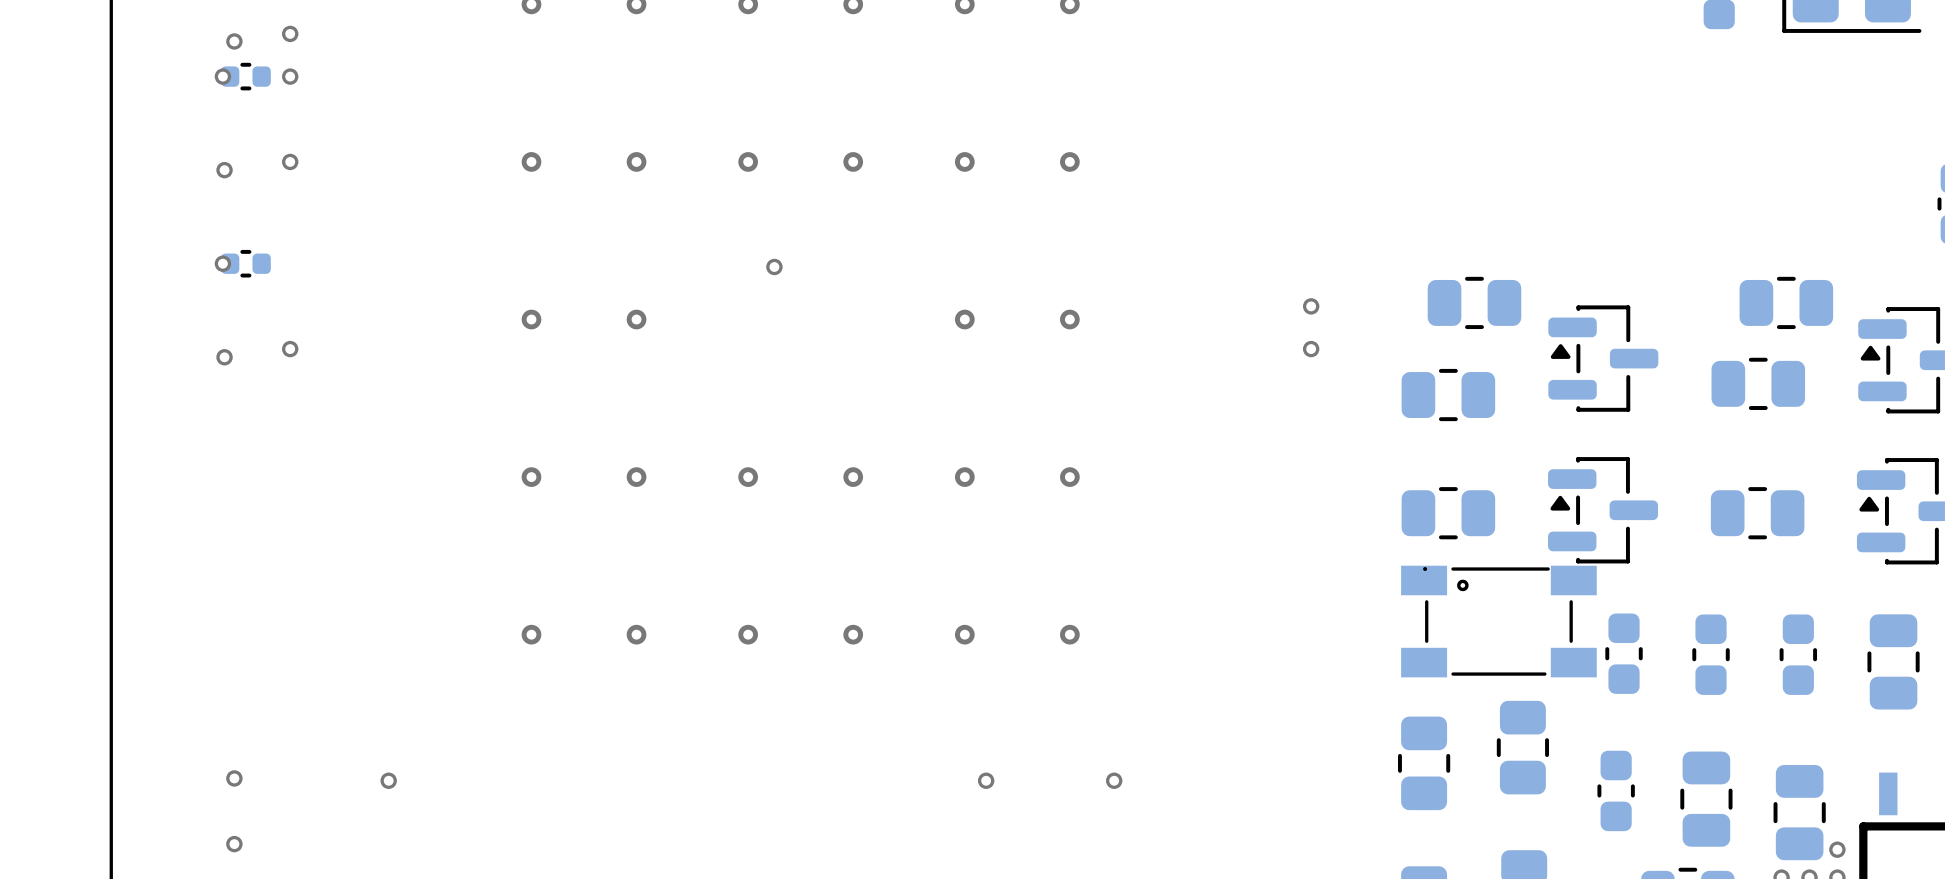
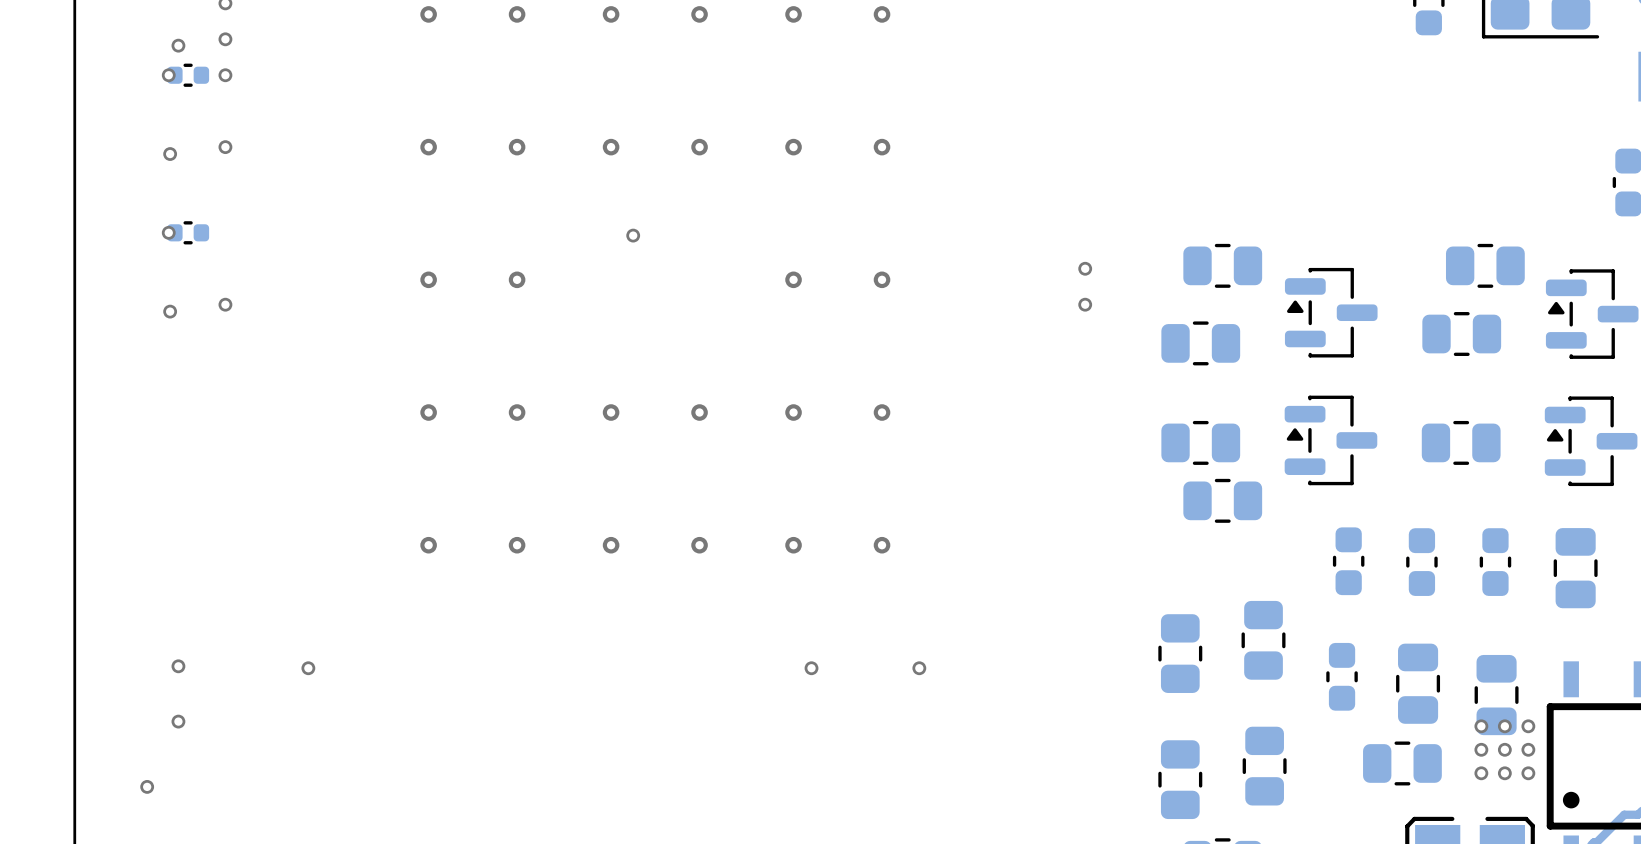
part: none -> (1222, 500)
part: (1498, 621) -> none
via: none -> (1481, 726)
via: none -> (1504, 726)

